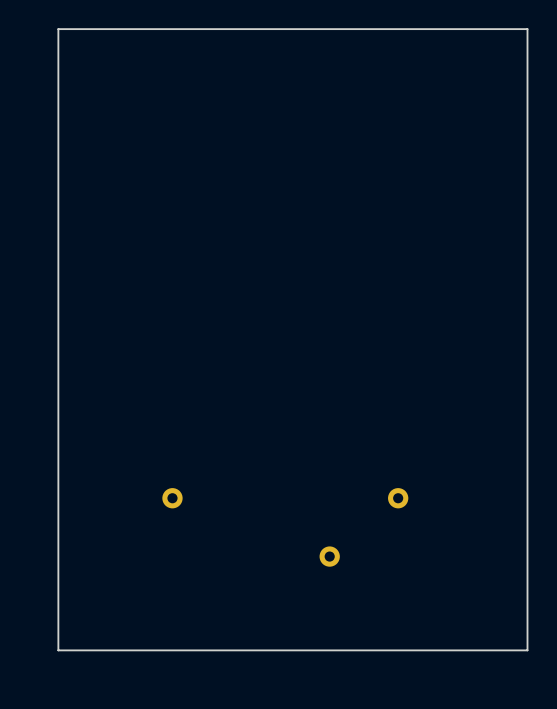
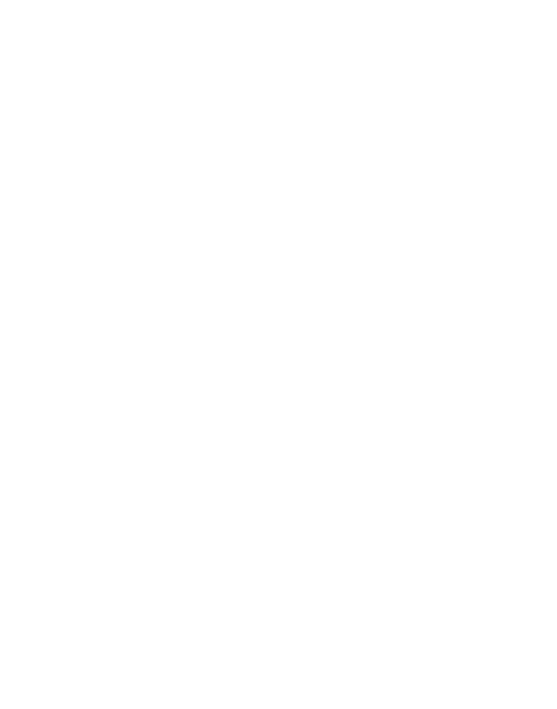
board edge: (527, 29) (58, 29) (58, 650) (527, 650) (527, 29) -> none
part: (172, 498) -> none
part: (398, 498) -> none
part: (329, 556) -> none

